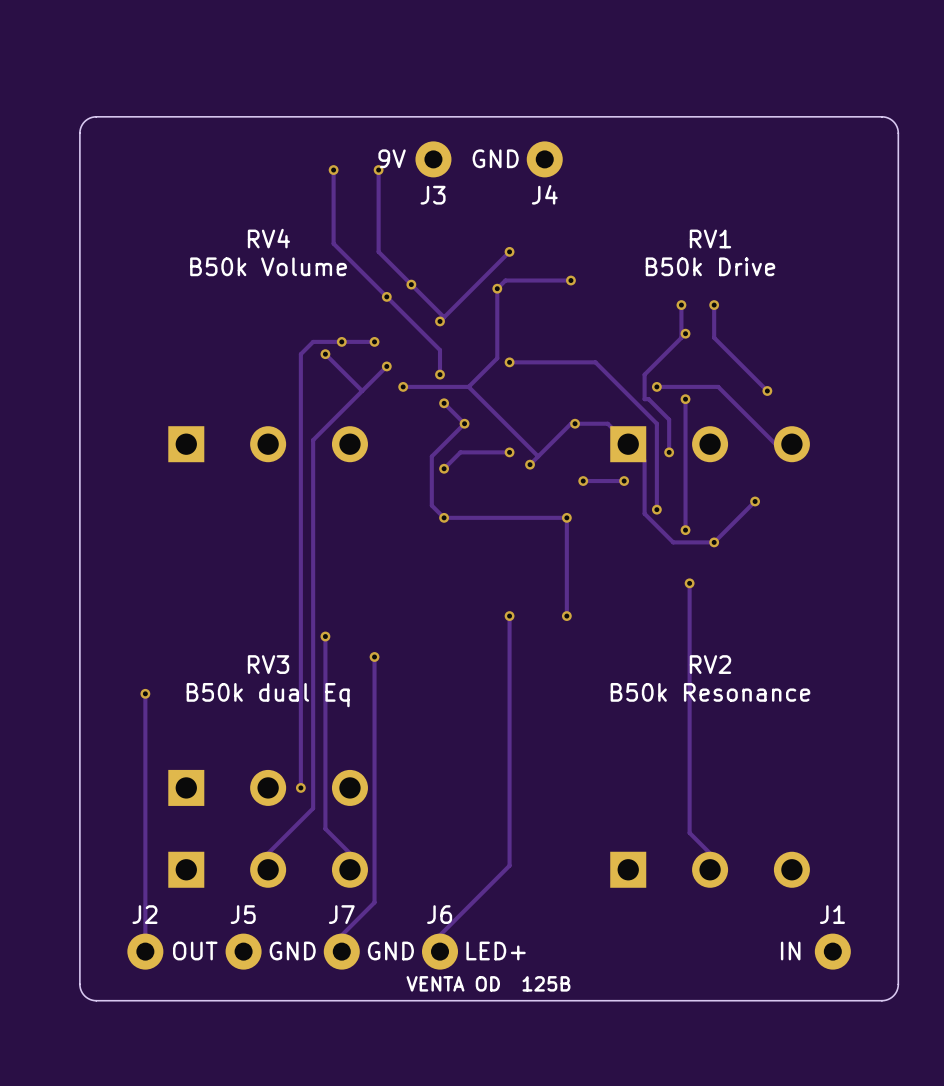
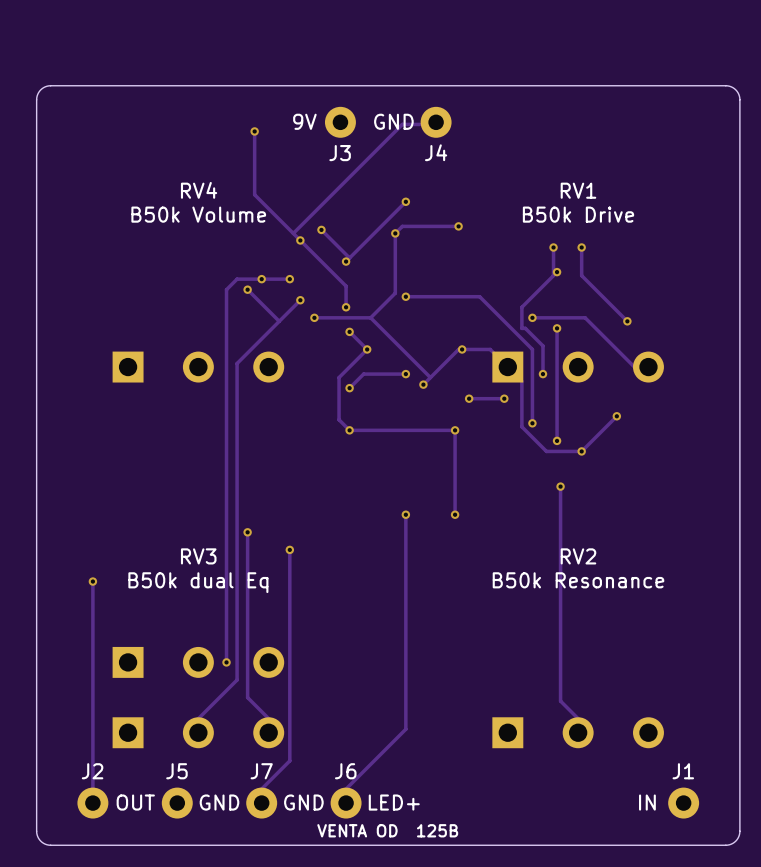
track: none -> (419, 124) (402, 124) (293, 233)
track: (378, 170) (378, 251) (411, 284) -> none
via: (378, 170) -> none

